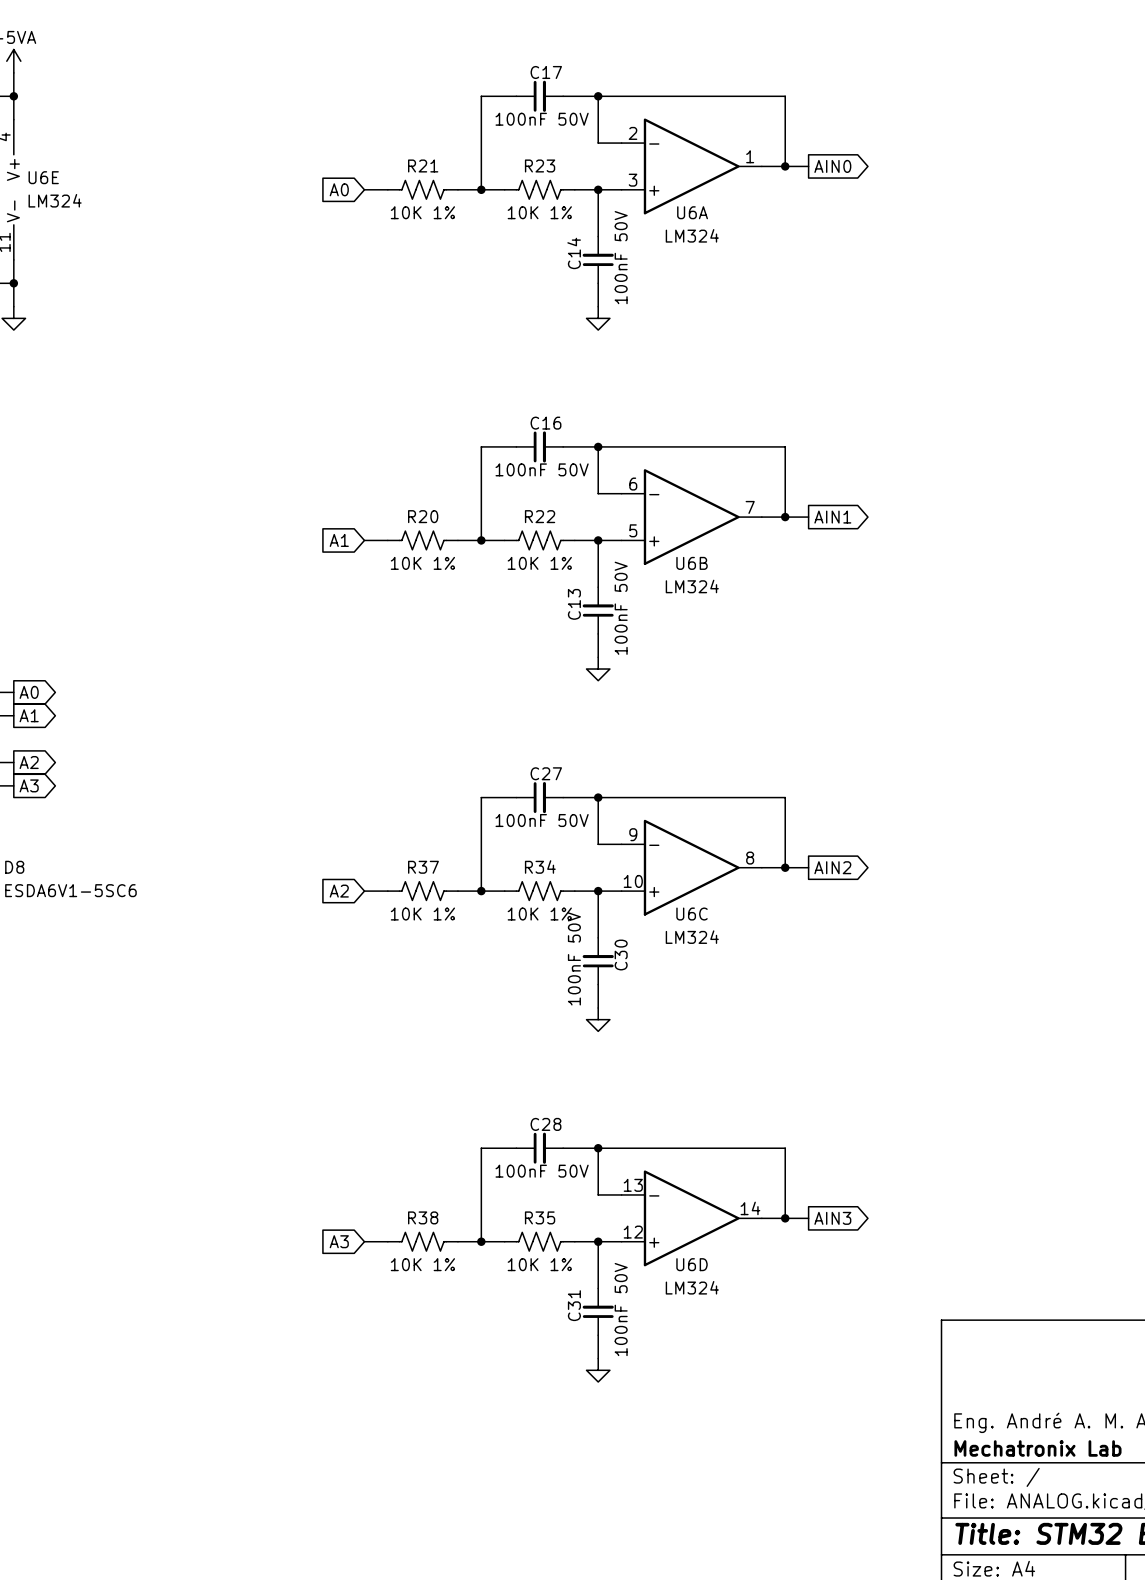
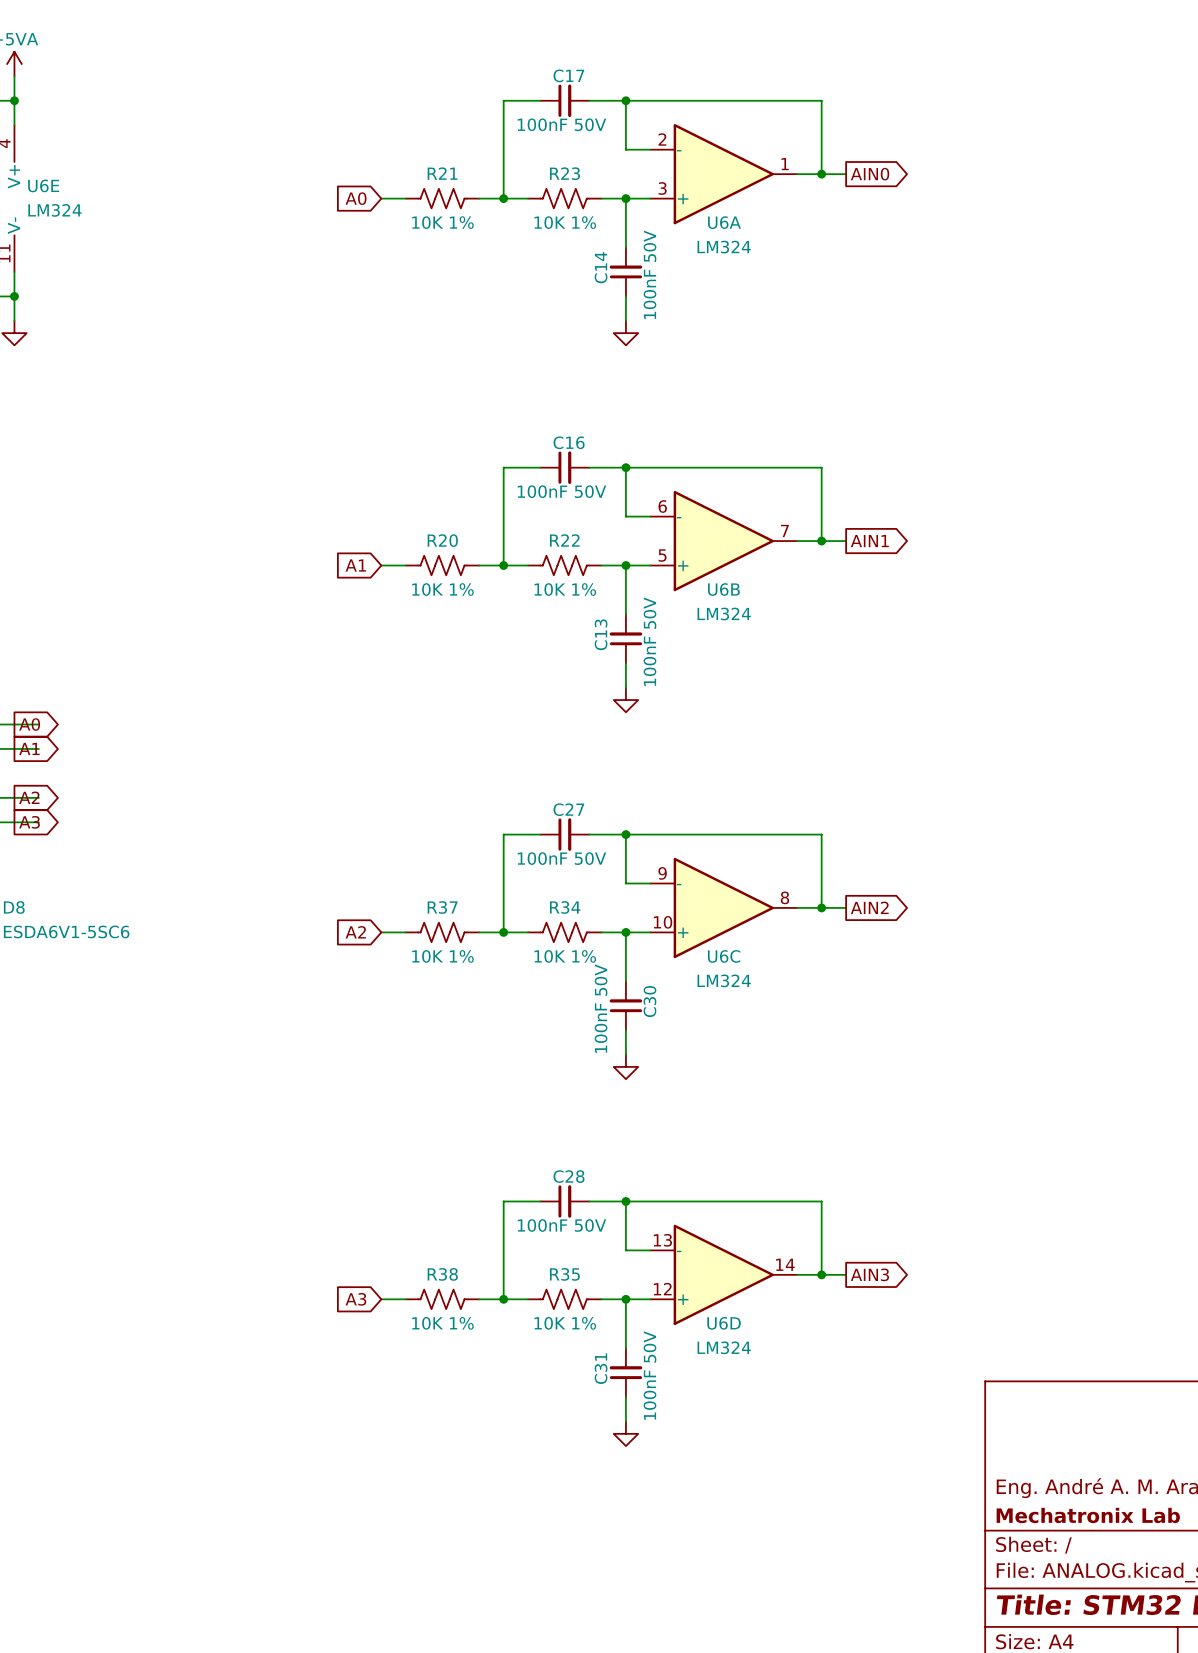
wire: none -> (14, 724) (38, 724)
wire: none -> (14, 748) (38, 748)
wire: none -> (14, 797) (38, 797)
wire: none -> (14, 822) (38, 822)

